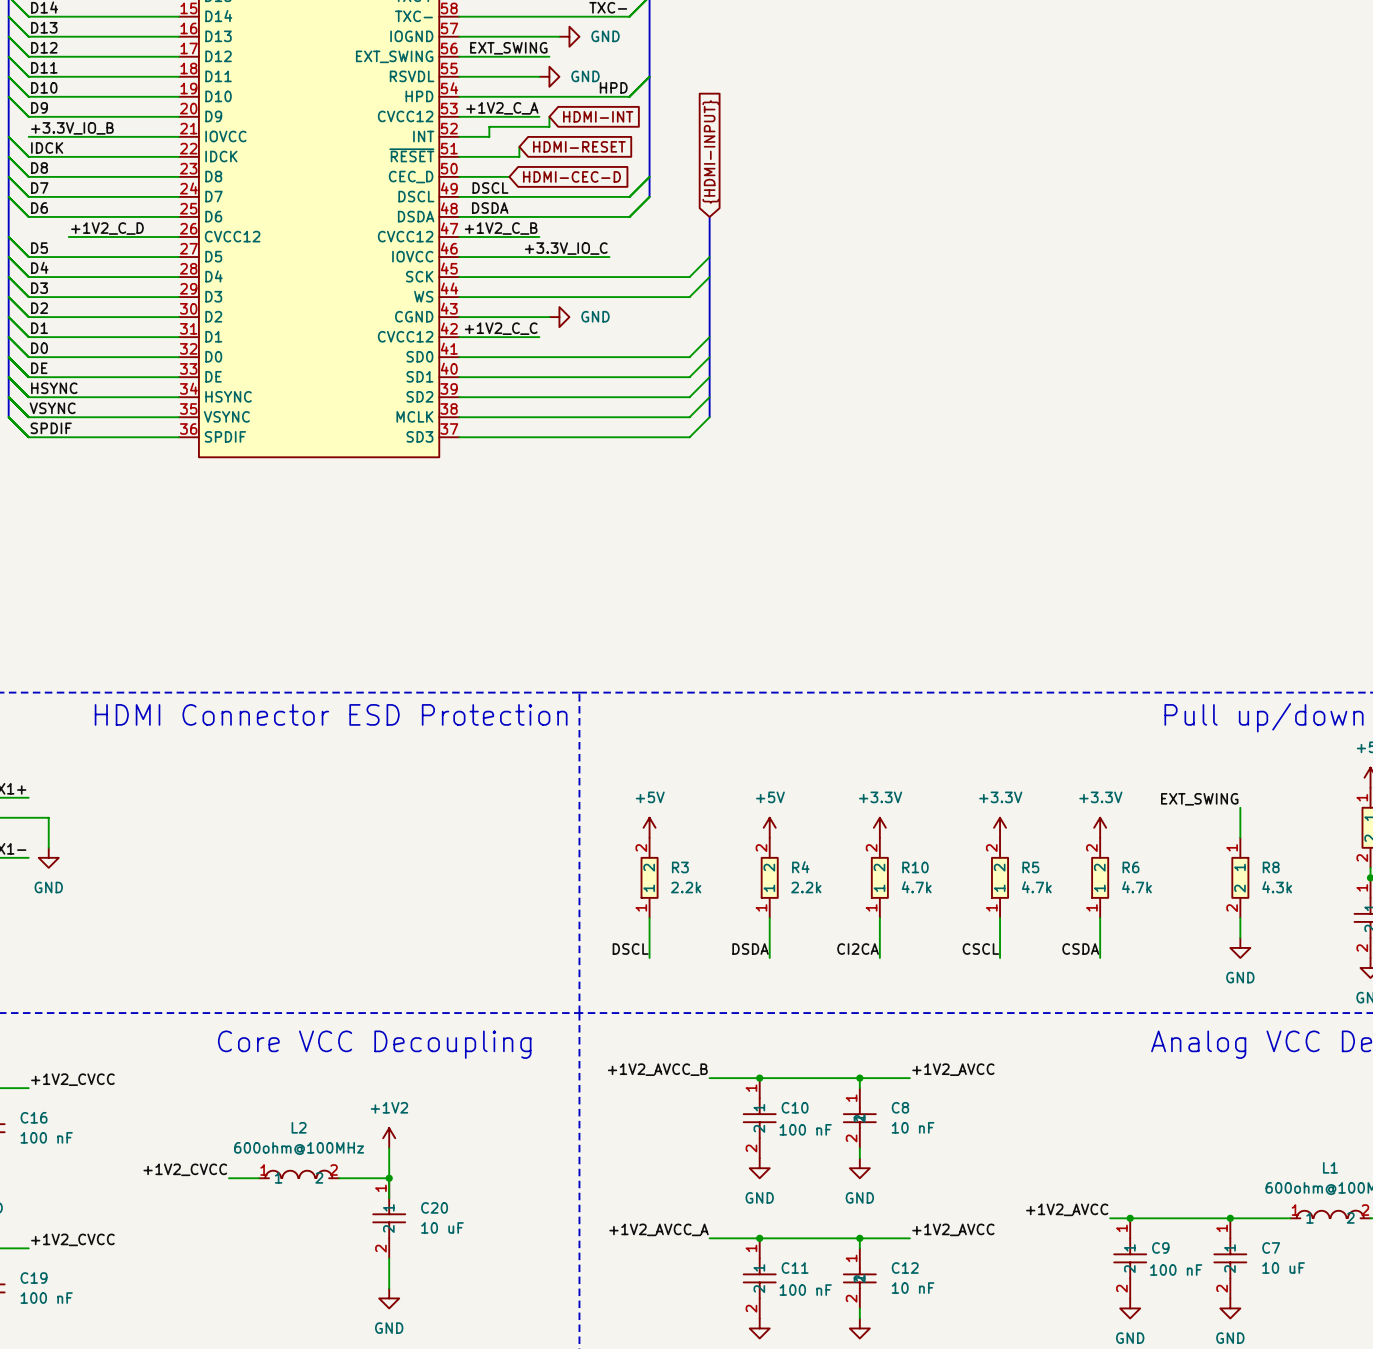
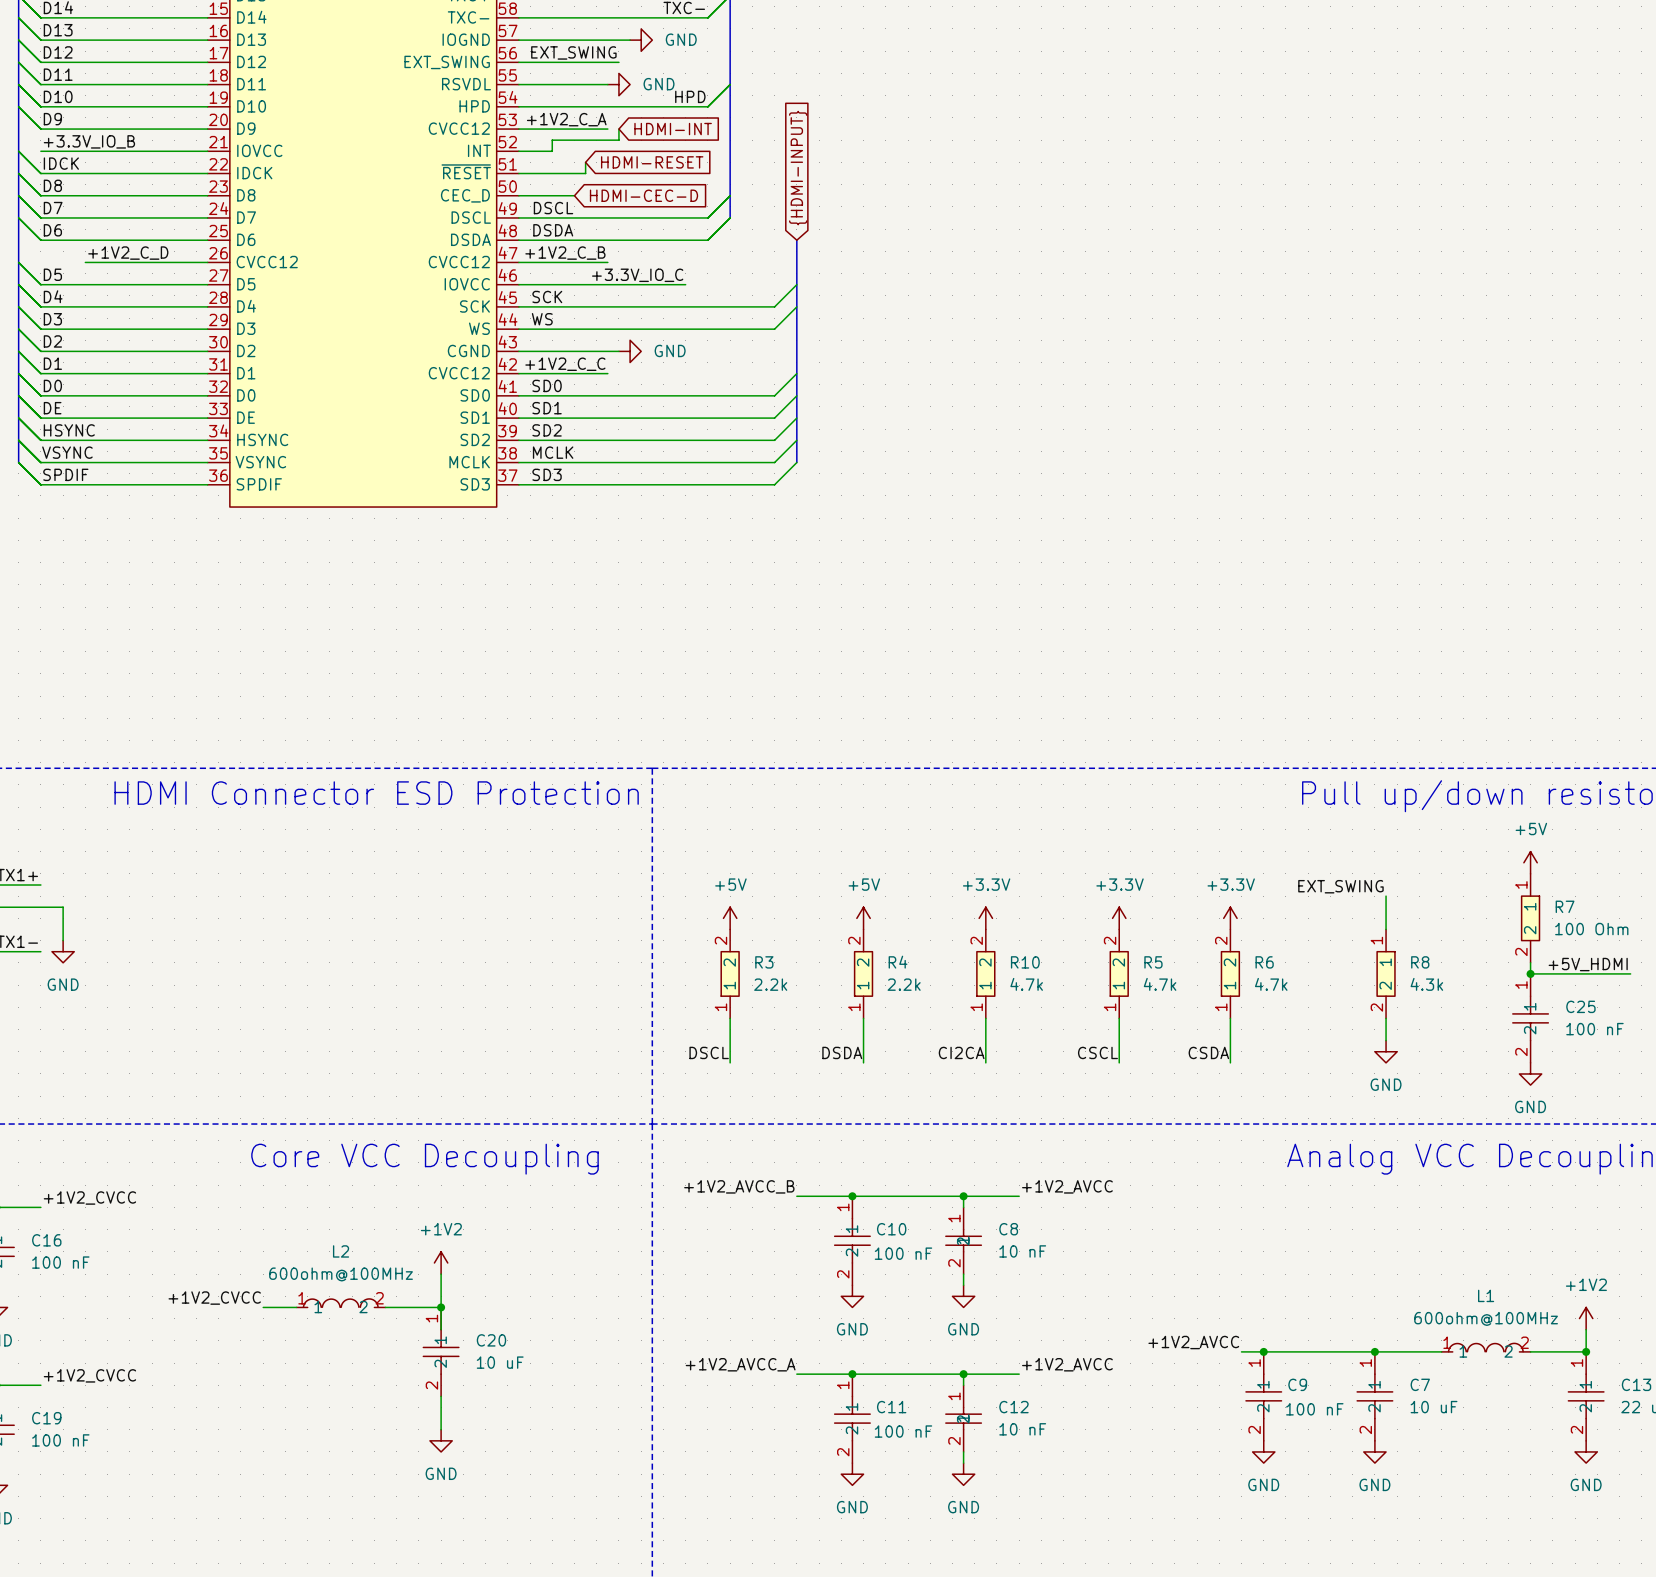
label: none -> SCK (547, 297)
label: none -> WS (542, 319)
label: none -> SD0 (547, 385)
label: none -> SD1 (547, 408)
label: none -> SD2 (547, 430)
label: none -> MCLK (553, 452)
label: none -> SD3 (547, 474)

